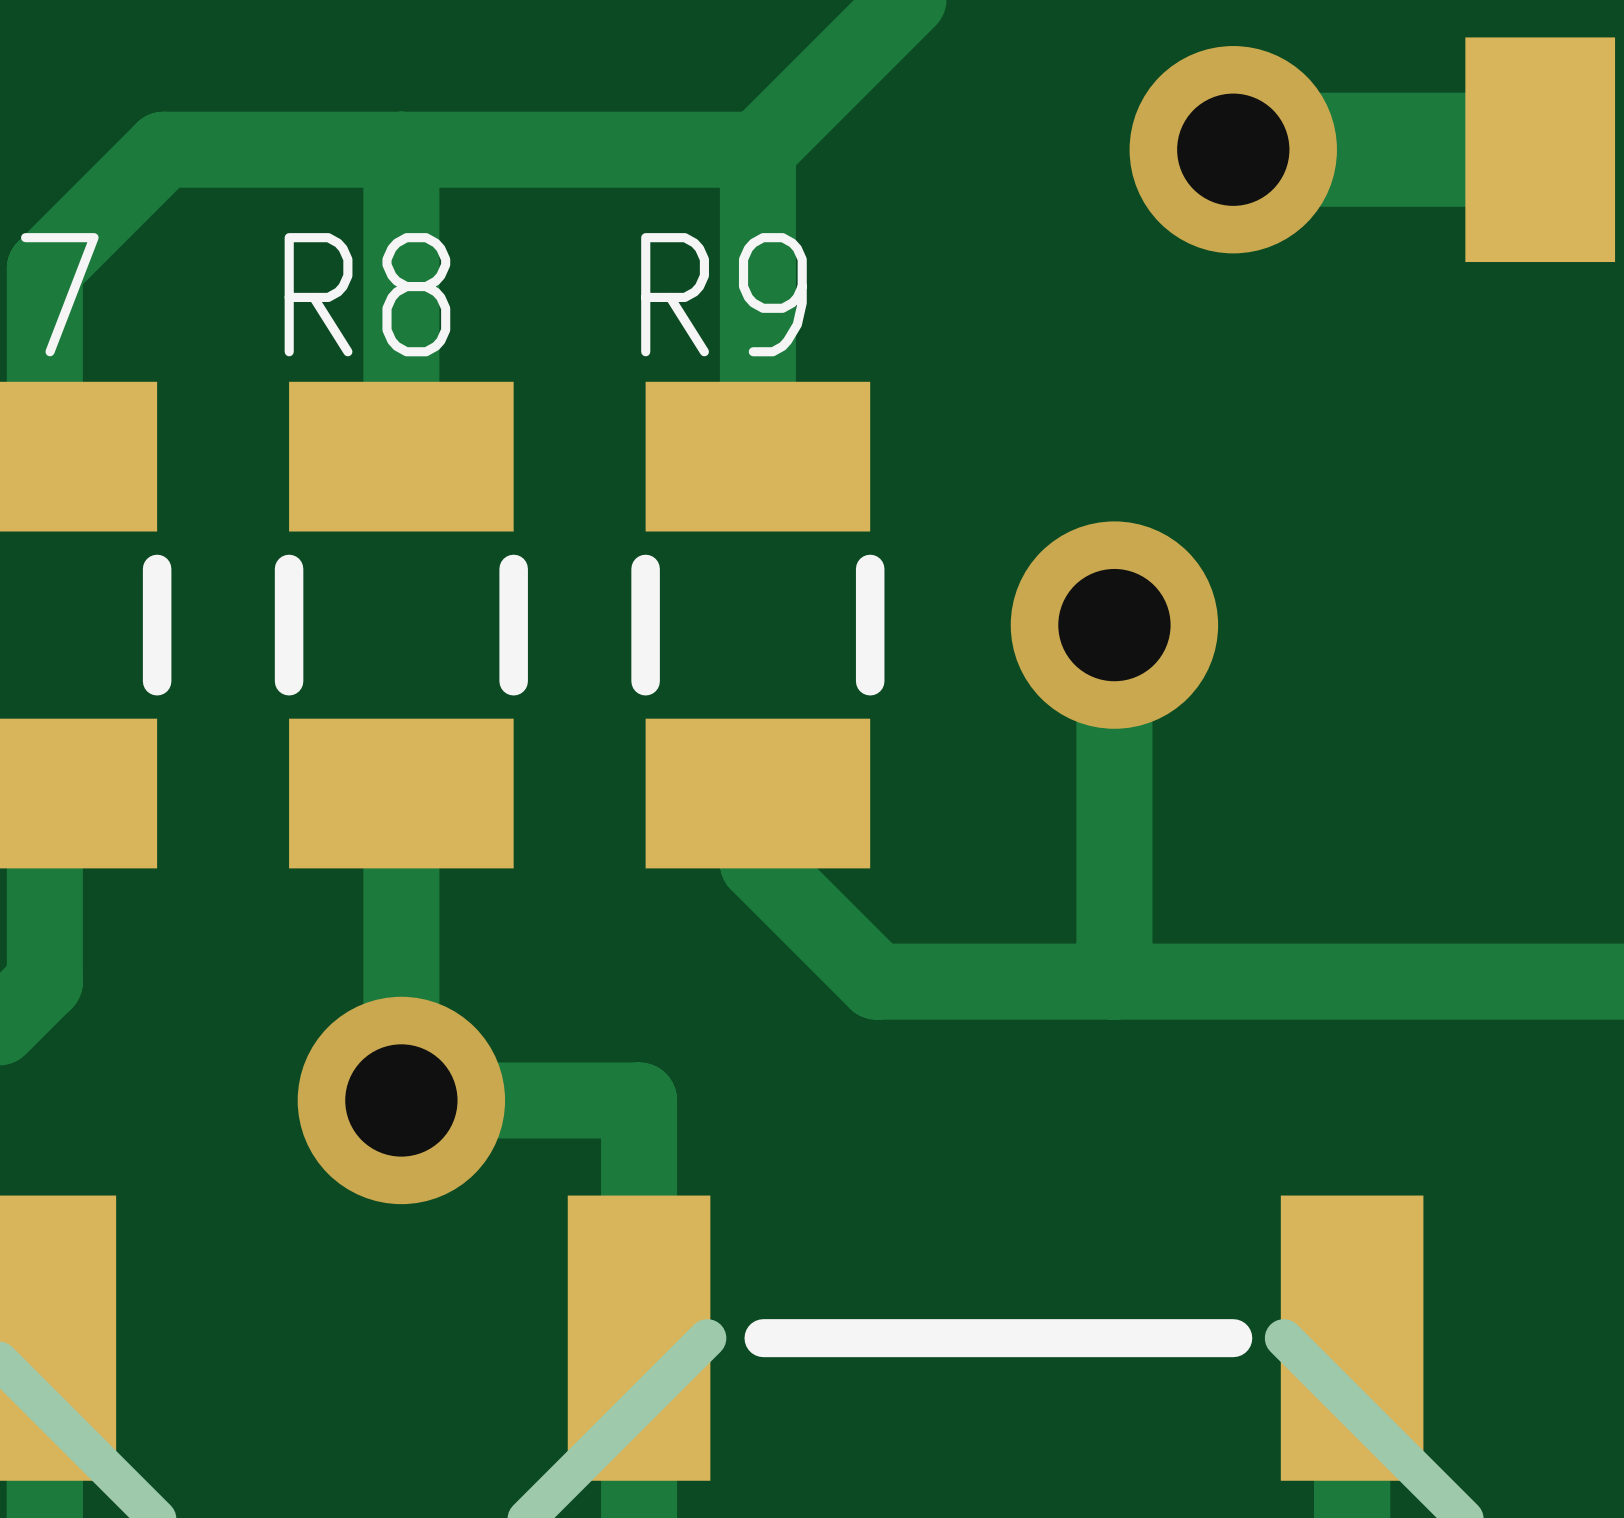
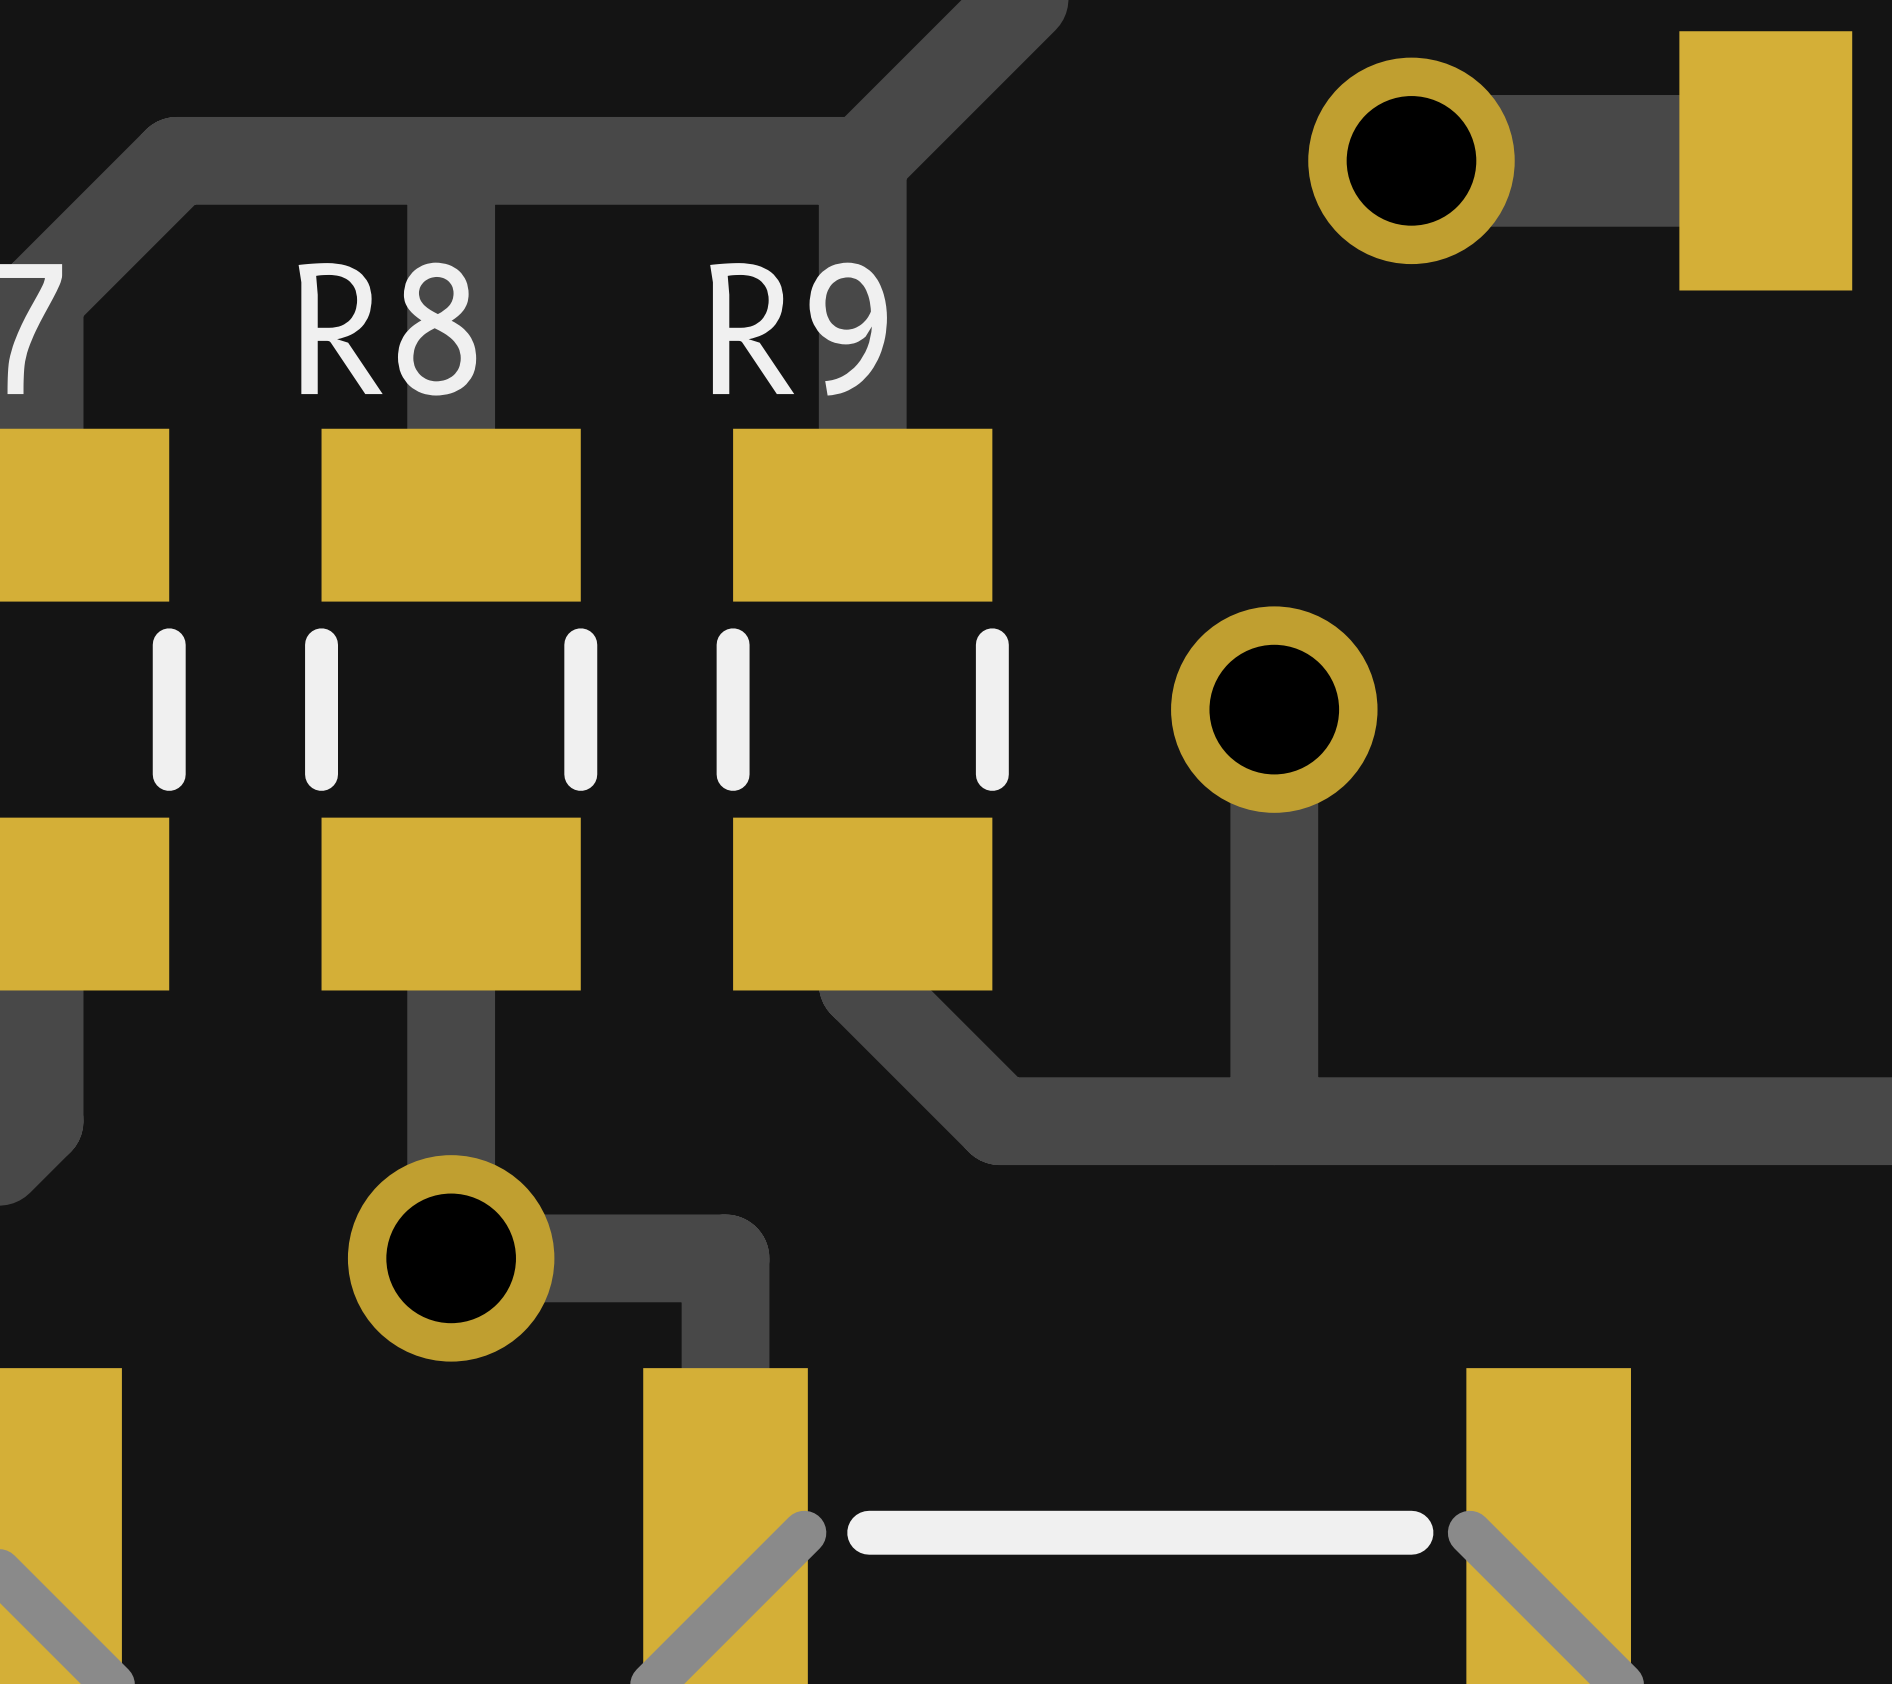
via size: [1129, 46, 1337, 254] -> [1308, 57, 1515, 265]
via size: [1010, 521, 1219, 729] -> [1171, 606, 1378, 813]
via size: [297, 996, 506, 1205] -> [347, 1155, 555, 1362]

